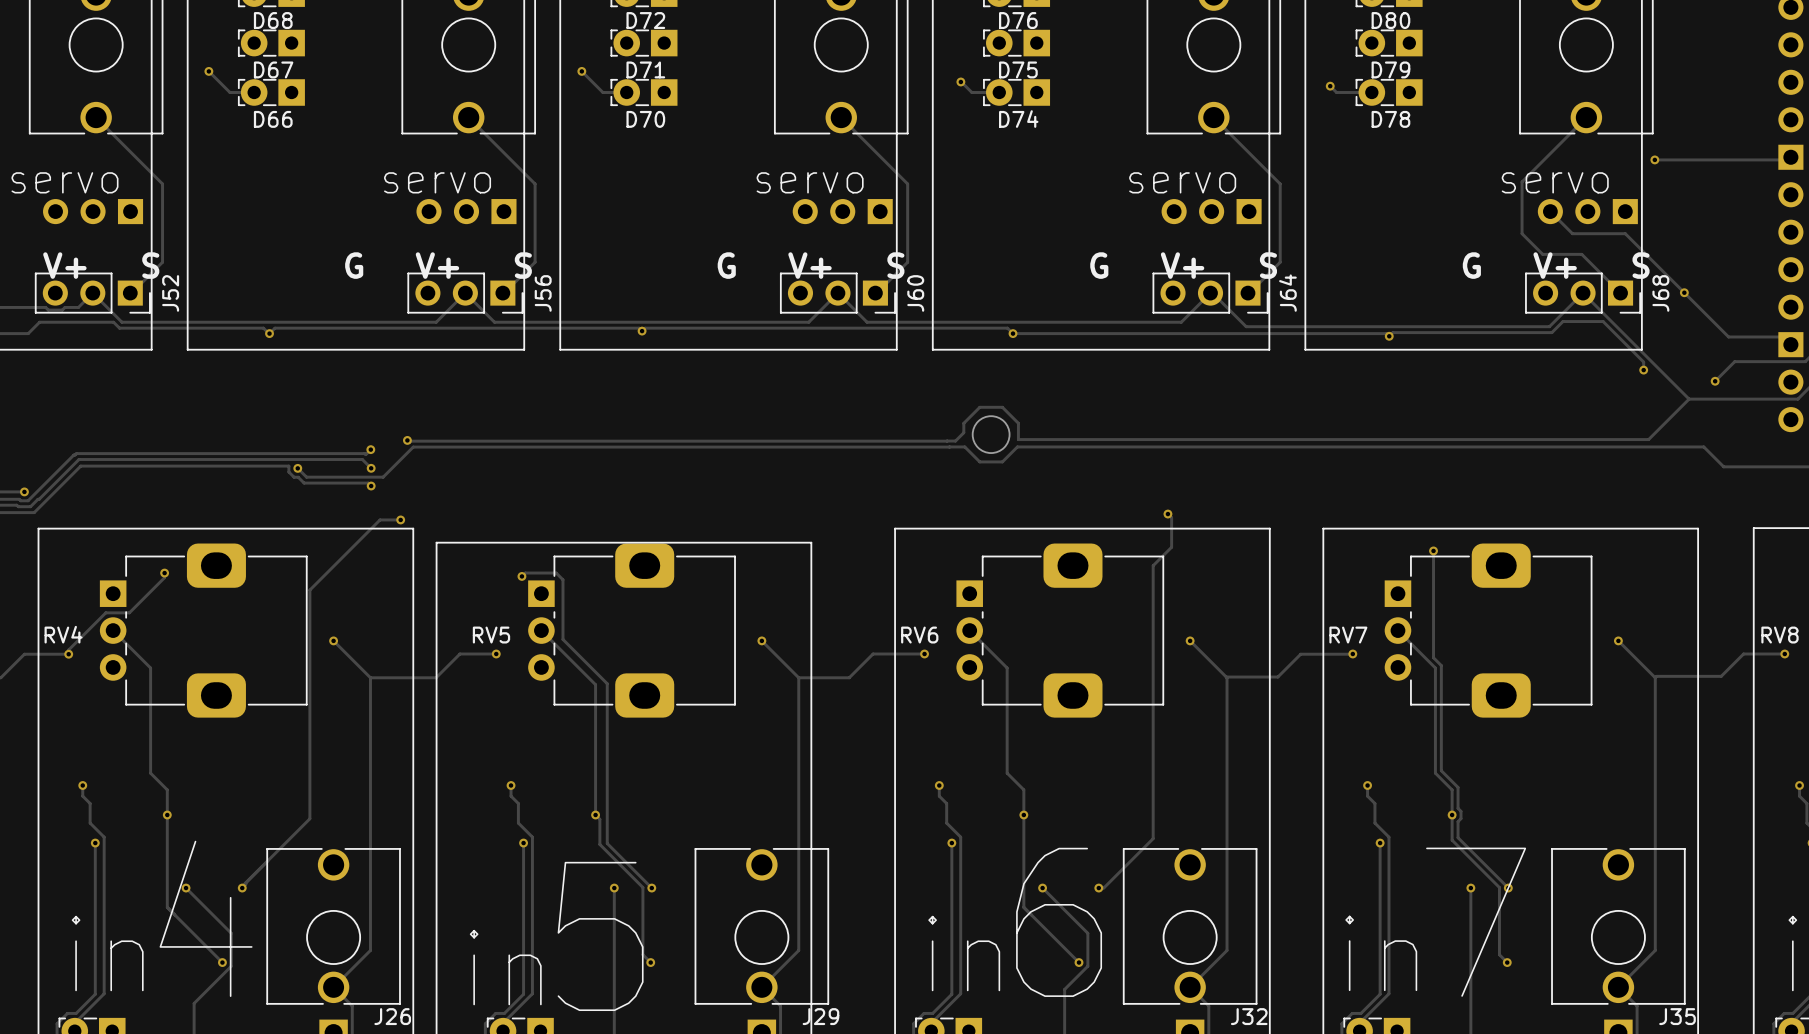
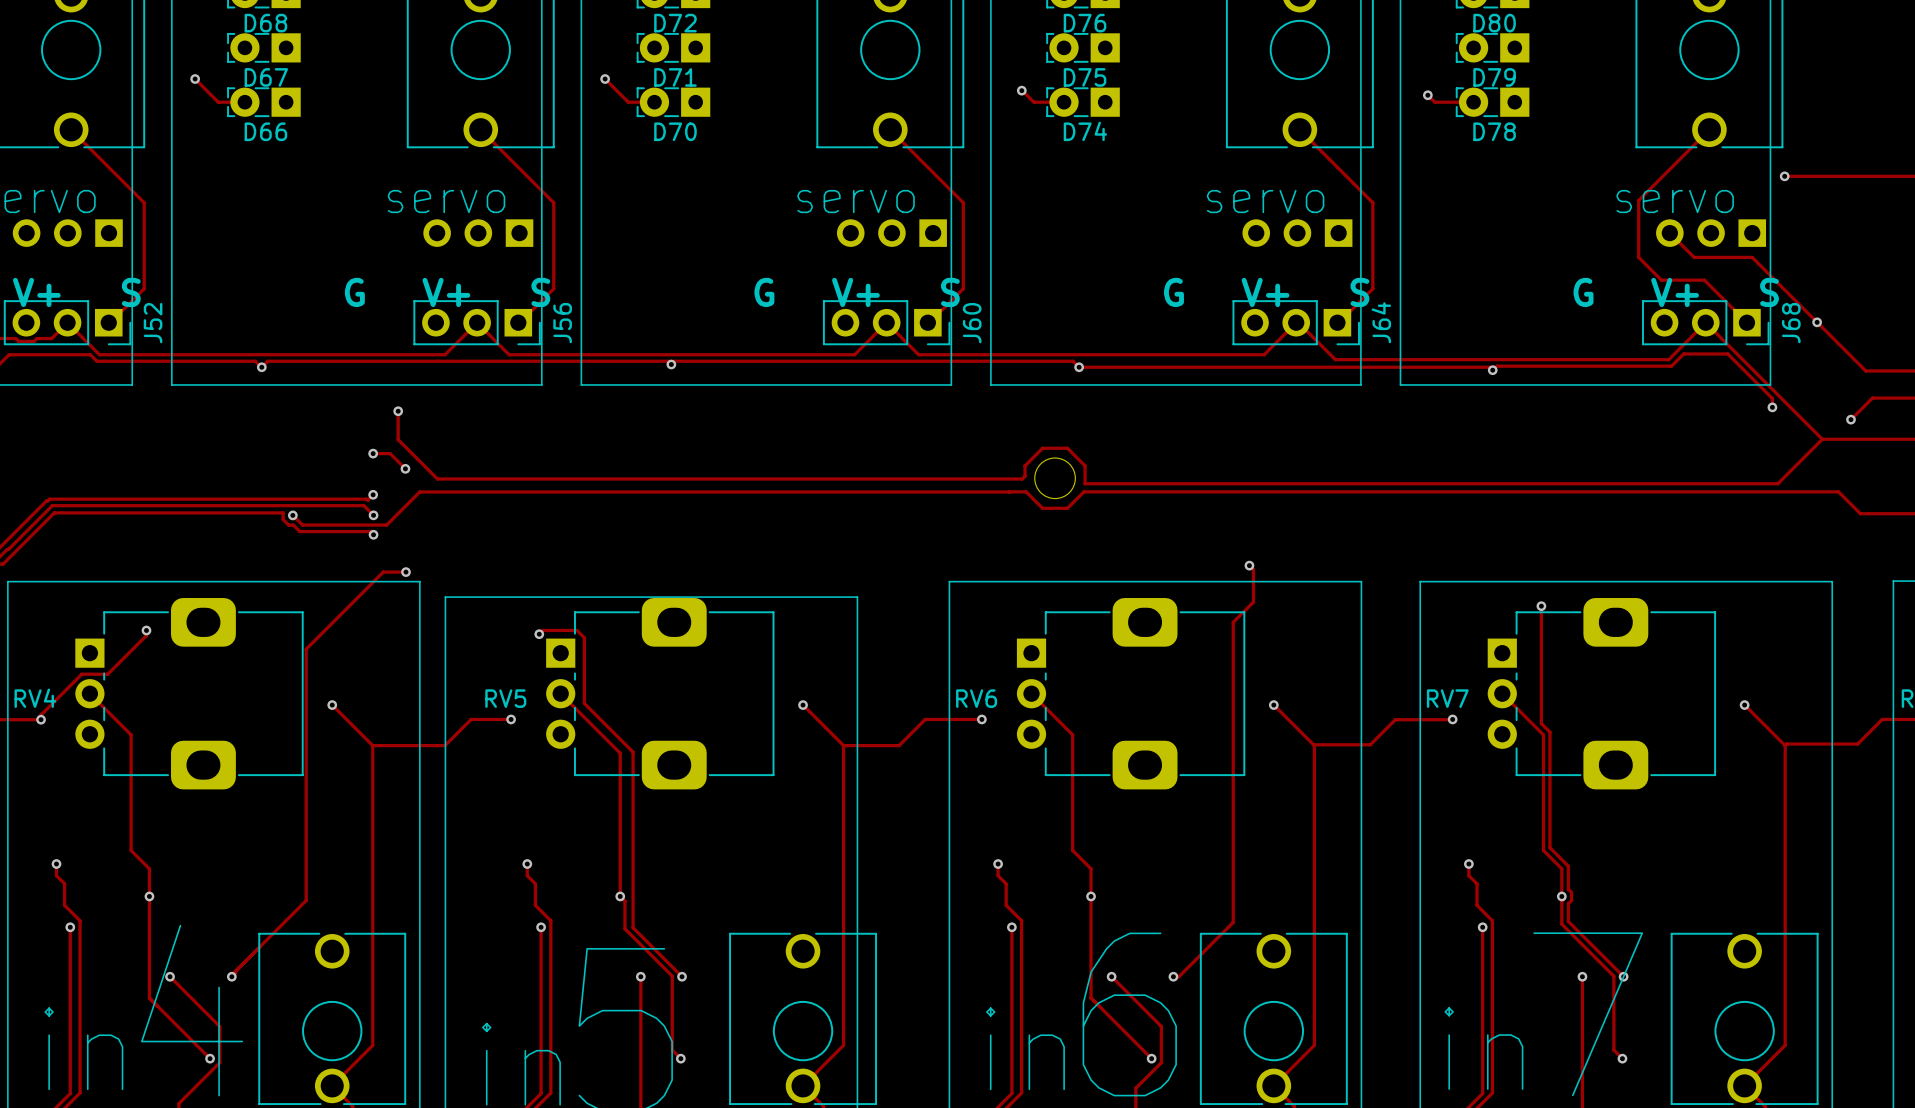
via: none -> (398, 411)
track: none -> (373, 453) (390, 453) (405, 468)
via: none -> (373, 453)
track: (961, 435) (955, 441) (947, 441) -> (1022, 478) (437, 478) (398, 439) (398, 411)
track: (407, 440) (409, 442) (947, 441) -> none
via position: (407, 440) -> (405, 468)

